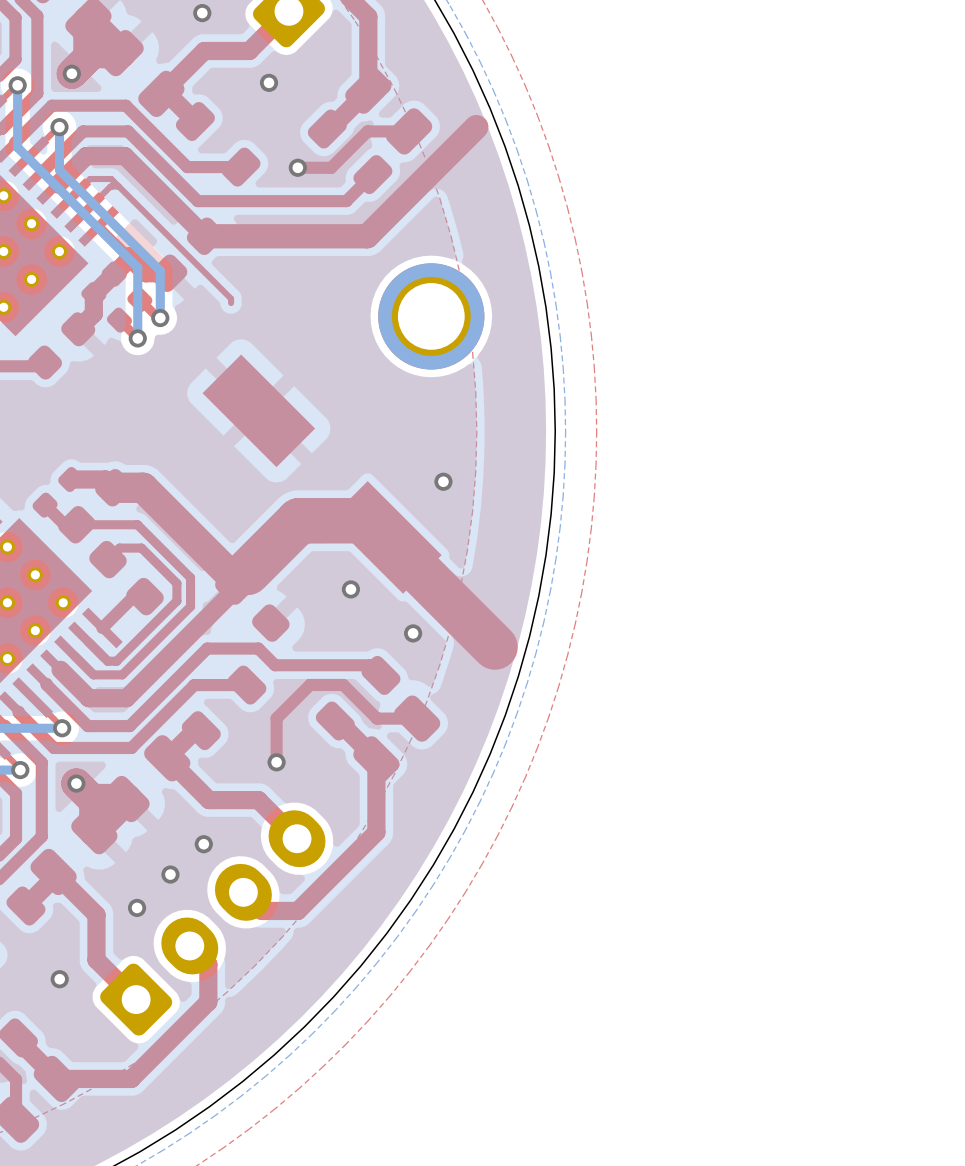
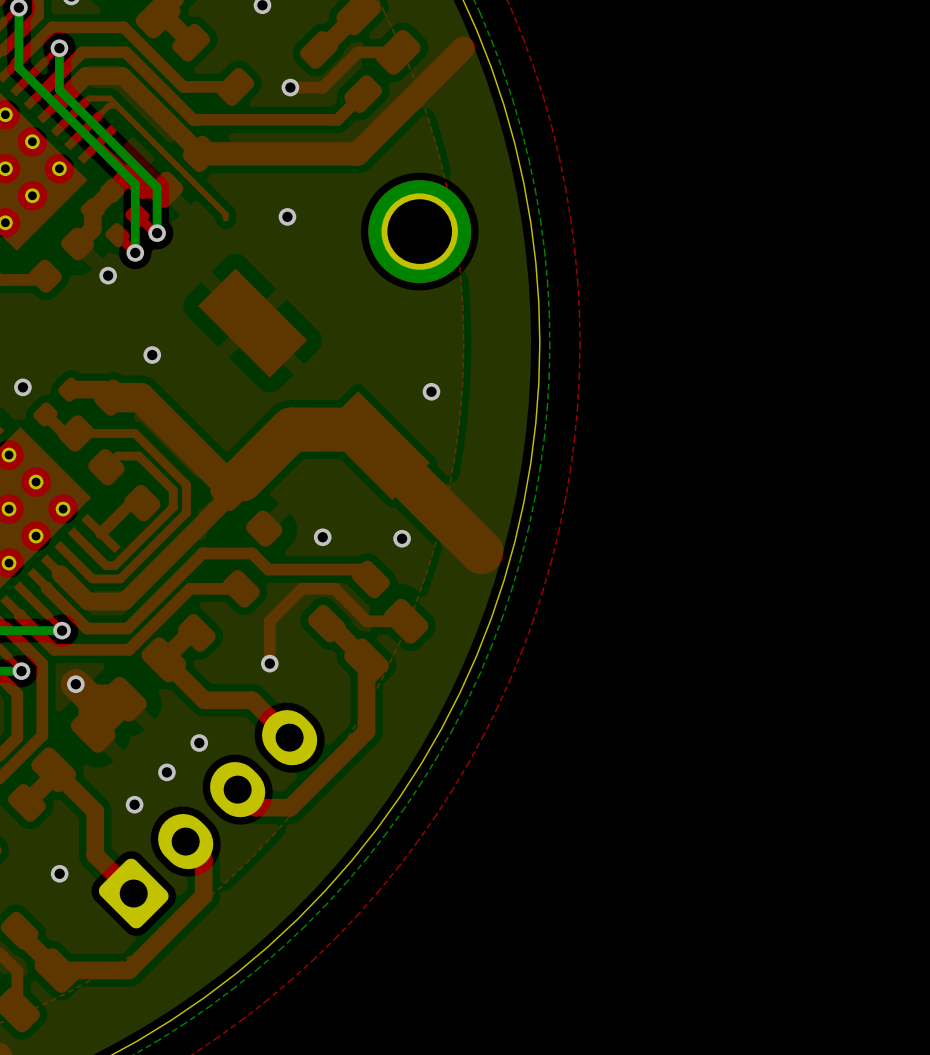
via: none -> (287, 216)
via: none -> (108, 275)
via: none -> (152, 355)
via: none -> (22, 387)
via position: (350, 589) -> (322, 537)

